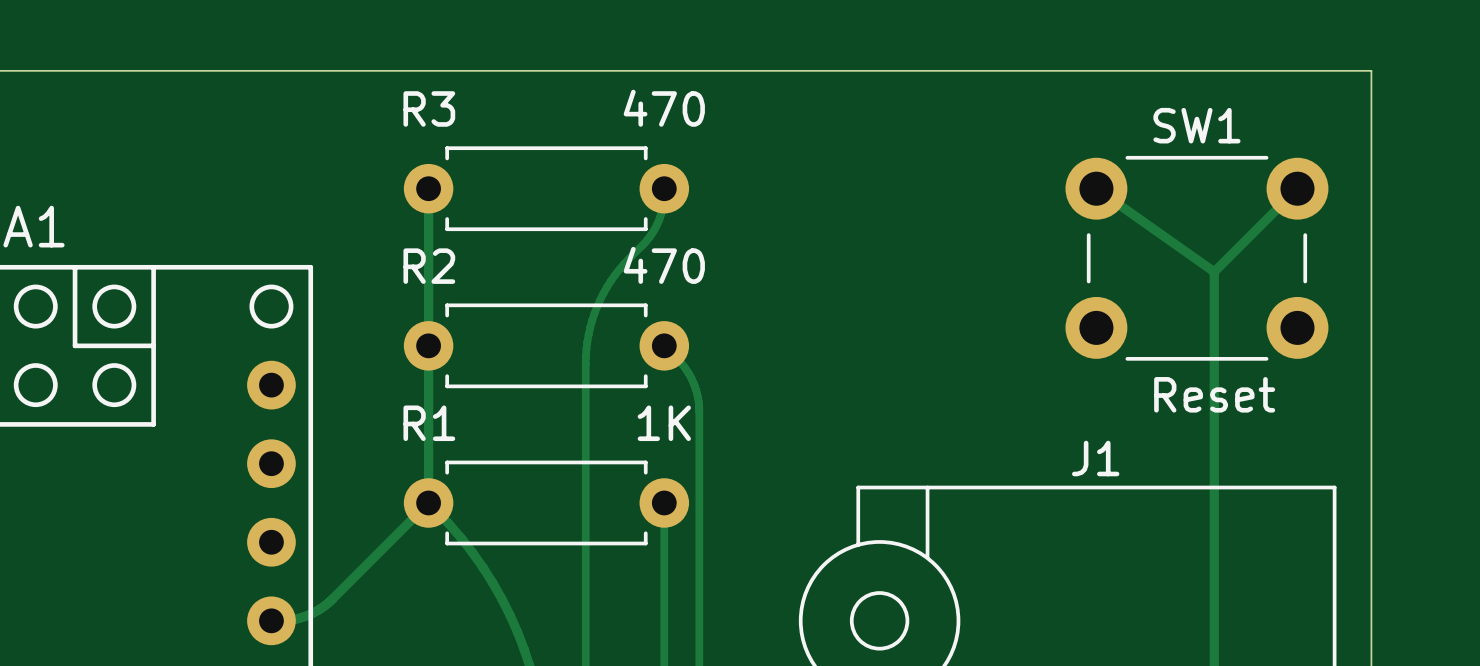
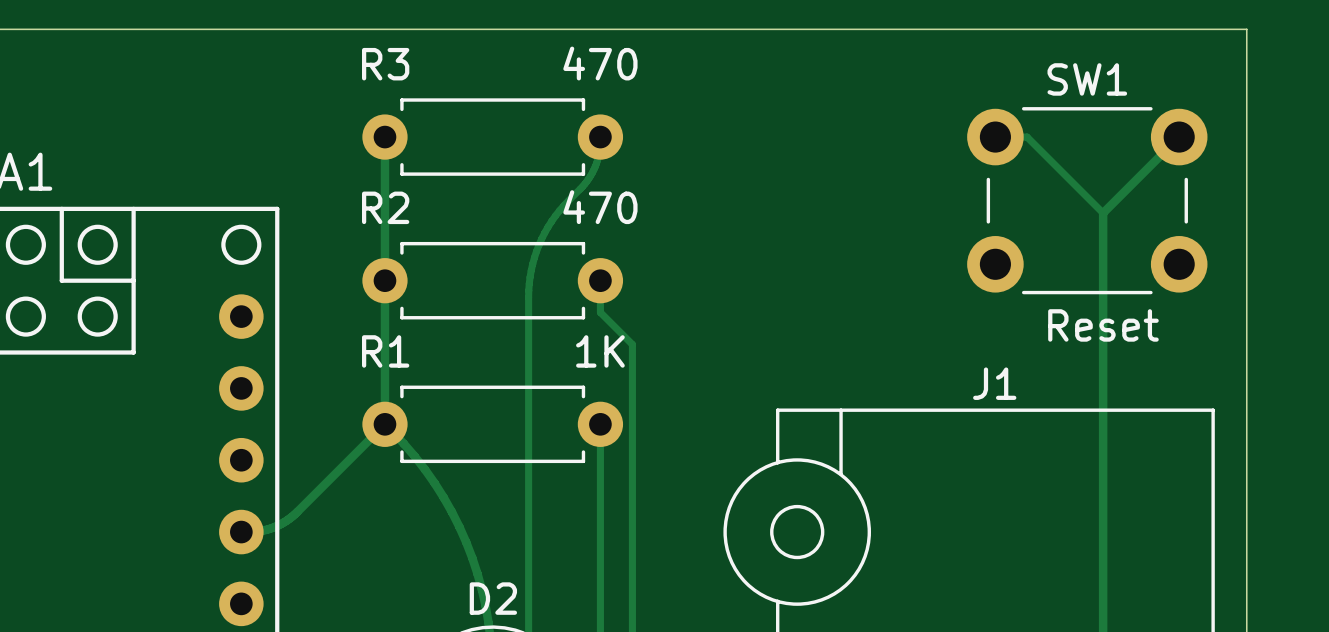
track: (1096, 188) (1214, 271) -> (995, 137) (1027, 137) (1103, 213)
track: (664, 345) (682, 364) (692, 379) (697, 397) (699, 415) -> (600, 280) (600, 312) (632, 344)

